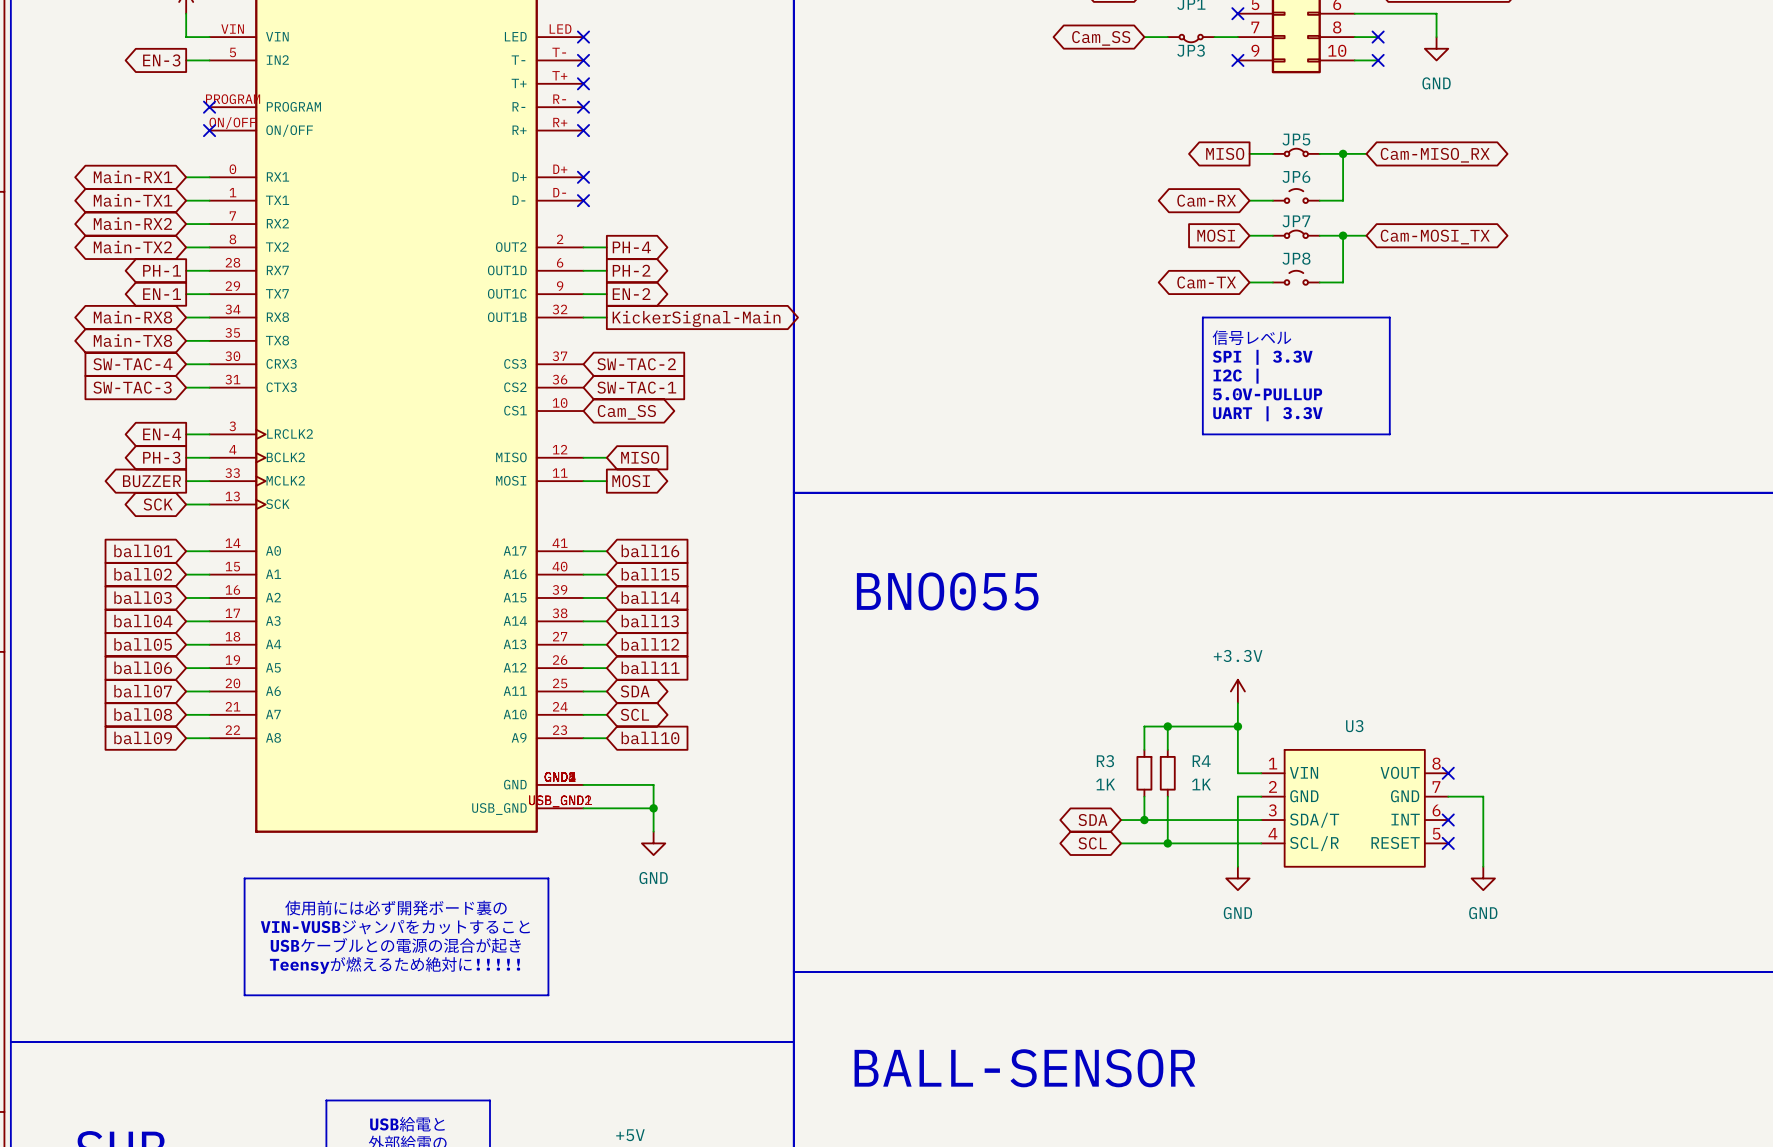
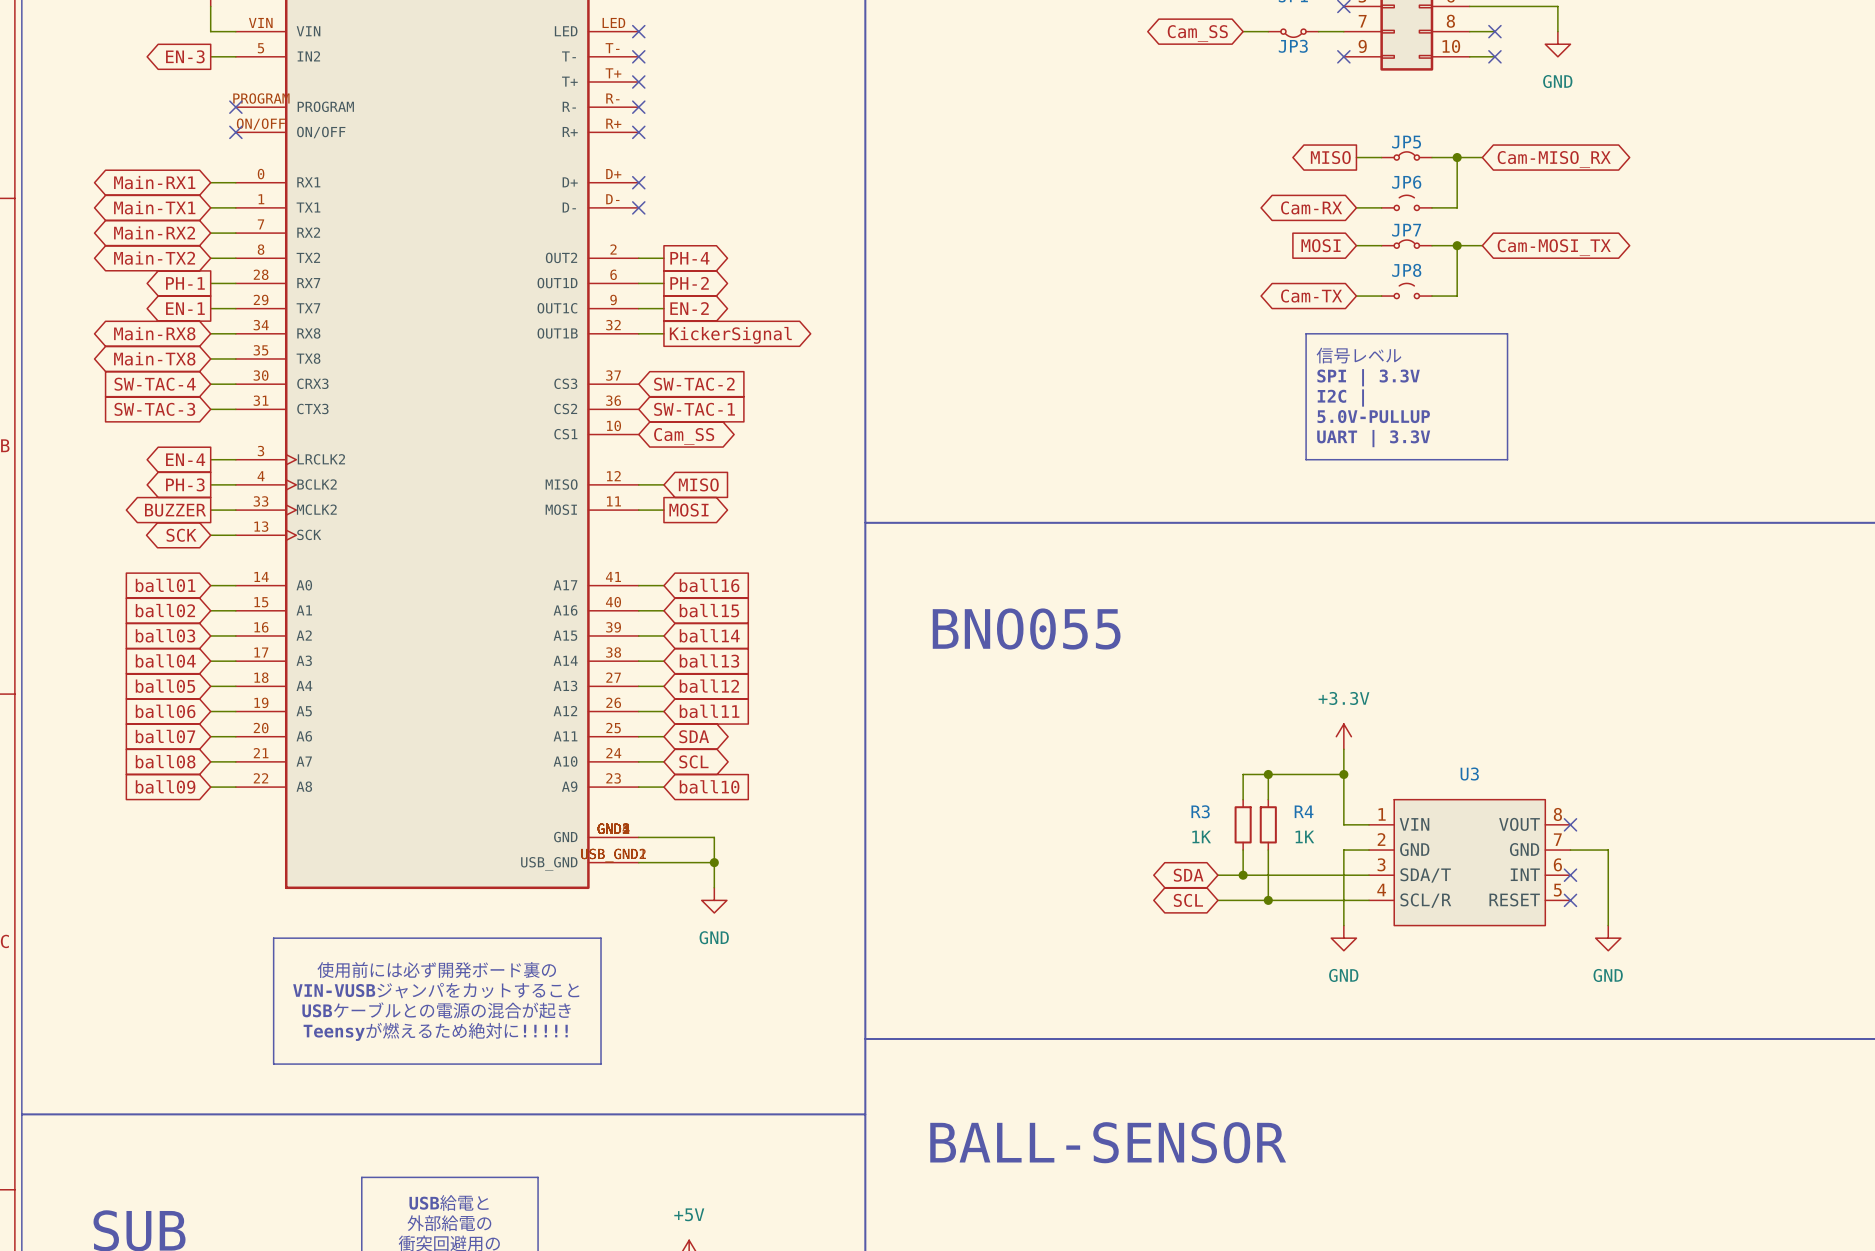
global label: KickerSignal-Main (696, 318) -> KickerSignal (730, 335)

